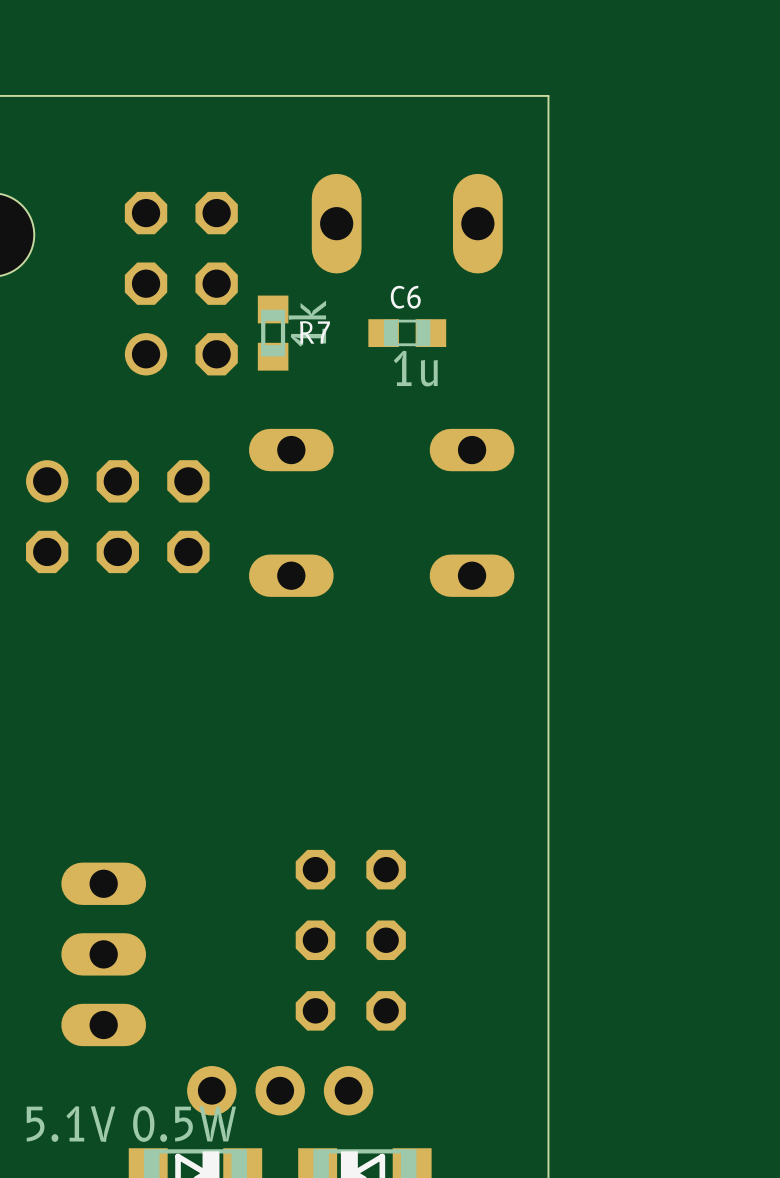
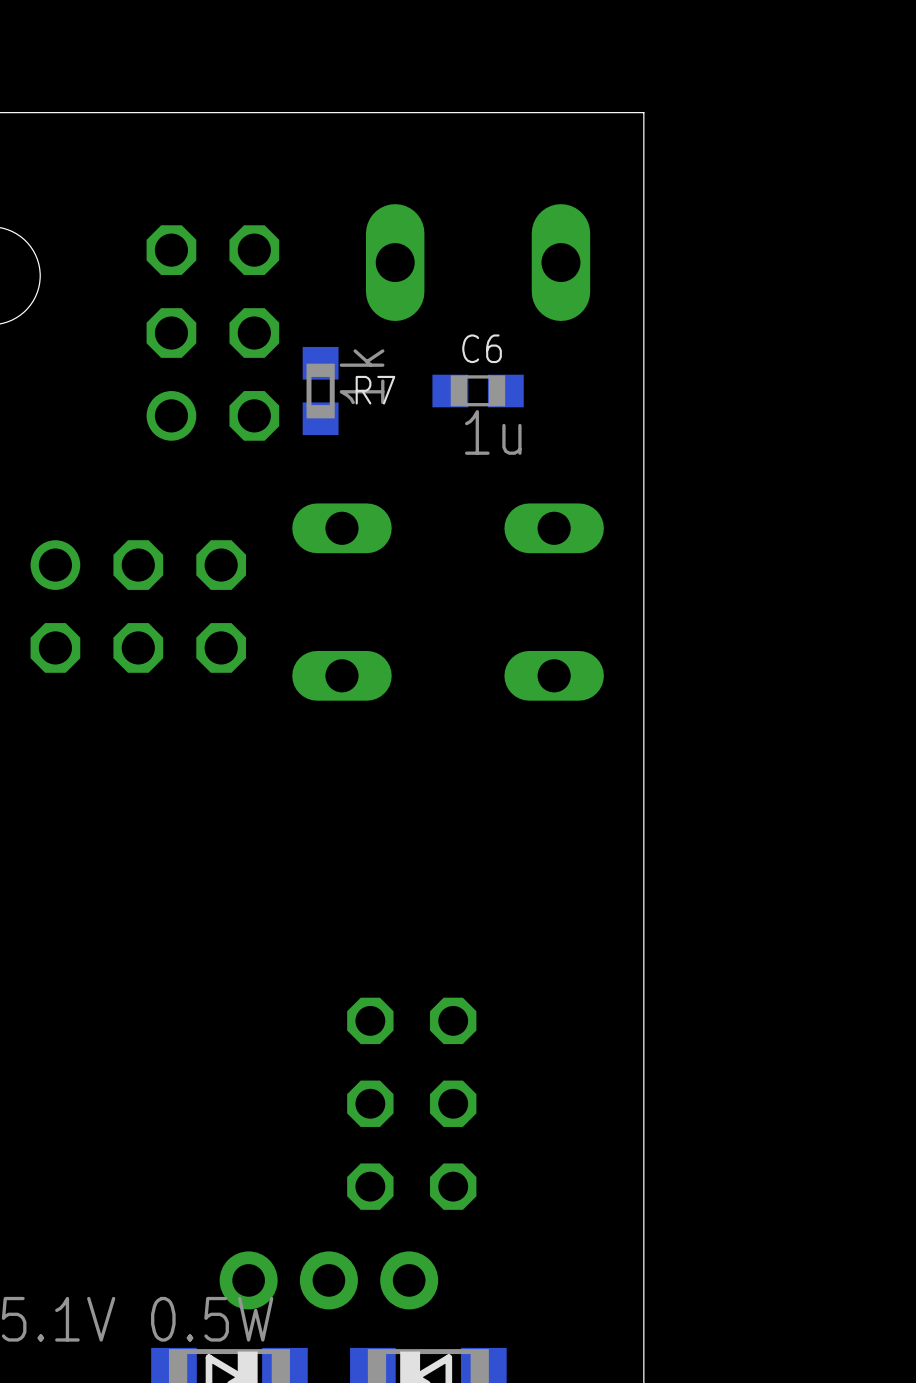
part: (103, 954) -> none

